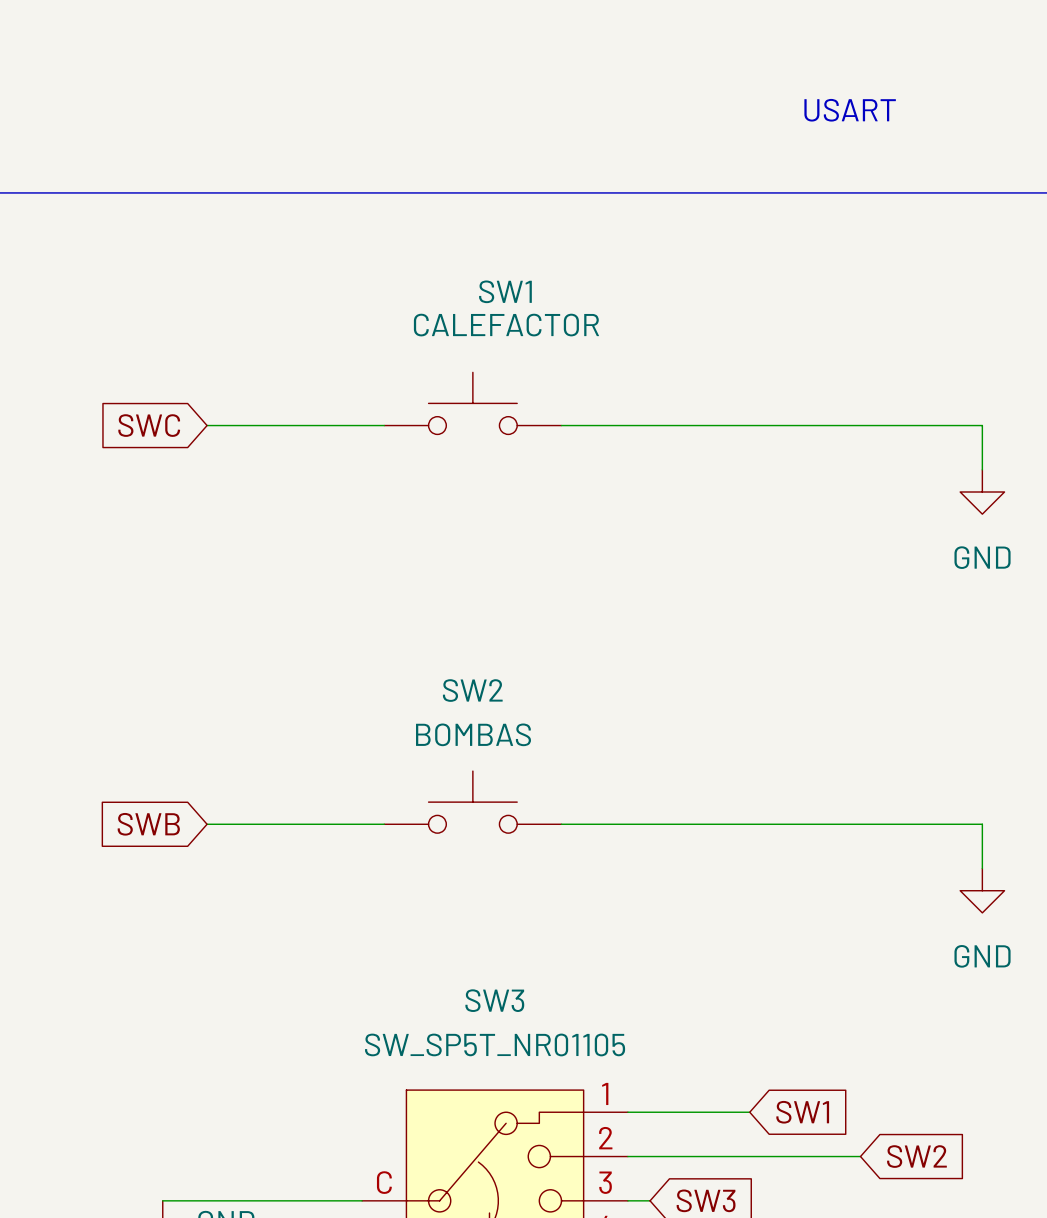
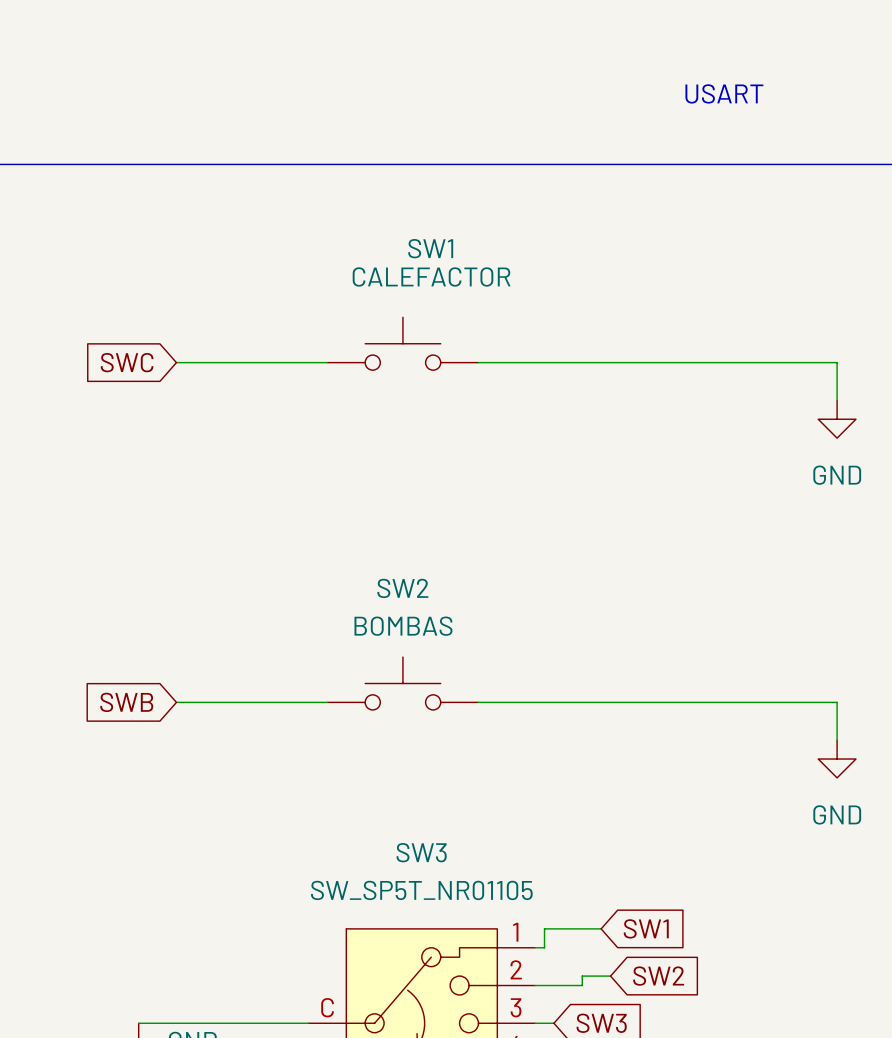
wire: (639, 1112) (749, 1112) -> (544, 947) (544, 928) (601, 928)
global label position: SW1 (802, 1112) -> SW1 (646, 928)
wire: (683, 1156) (860, 1156) -> (582, 985) (582, 976) (610, 976)
global label position: SW2 (916, 1156) -> SW2 (658, 976)

